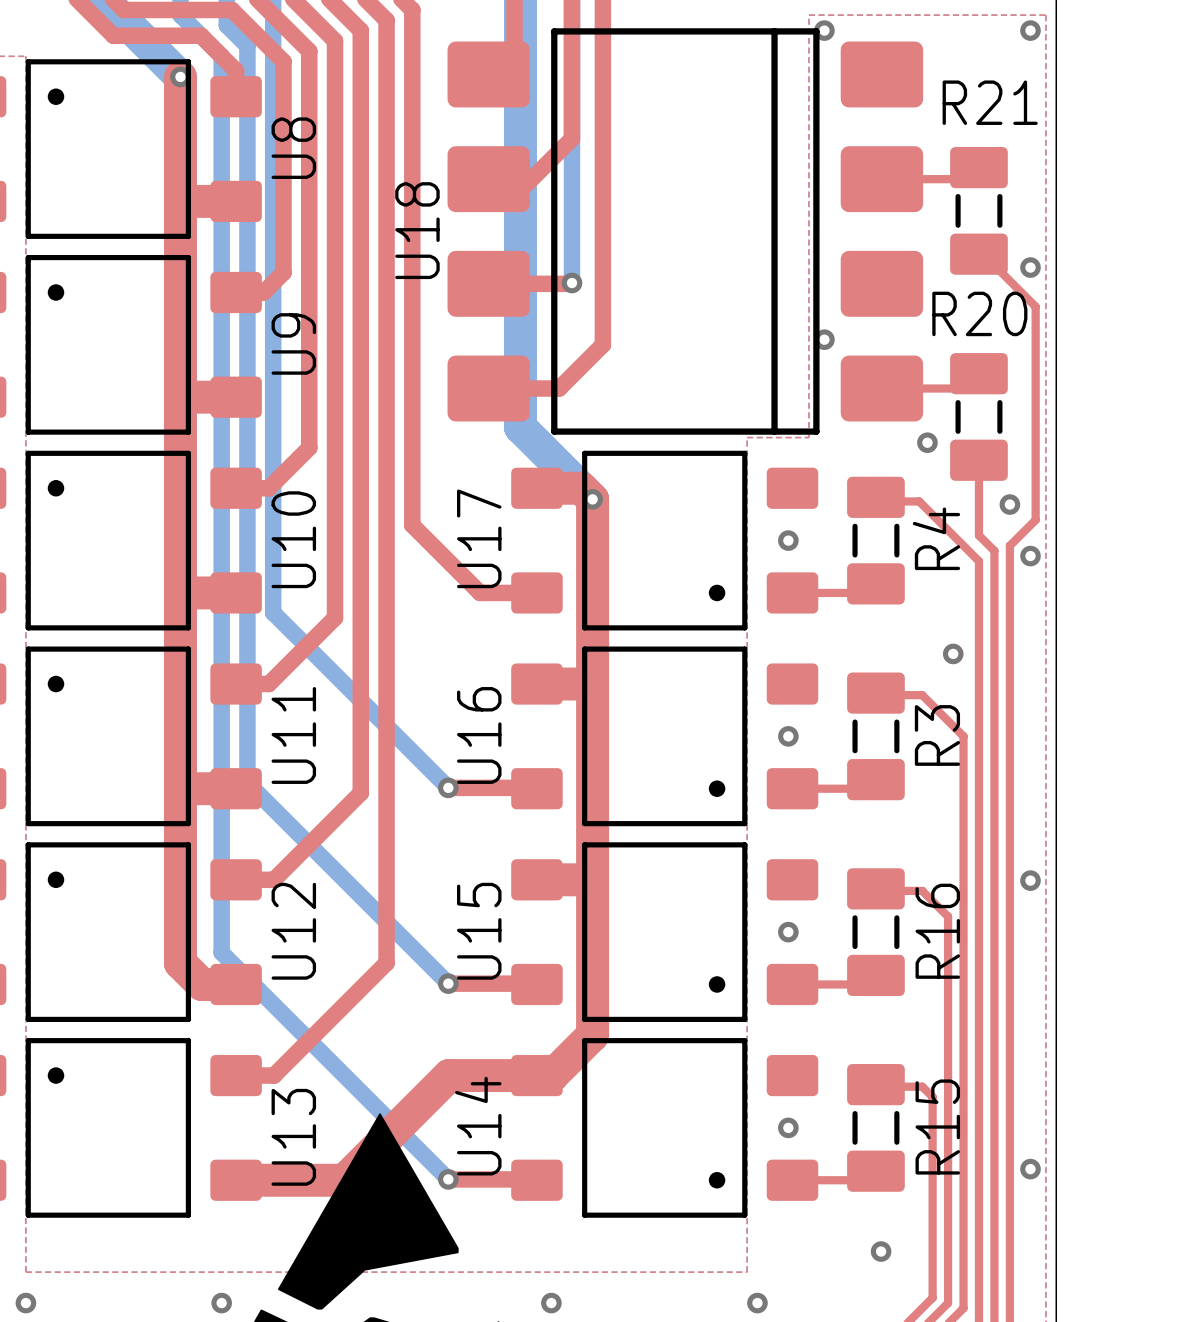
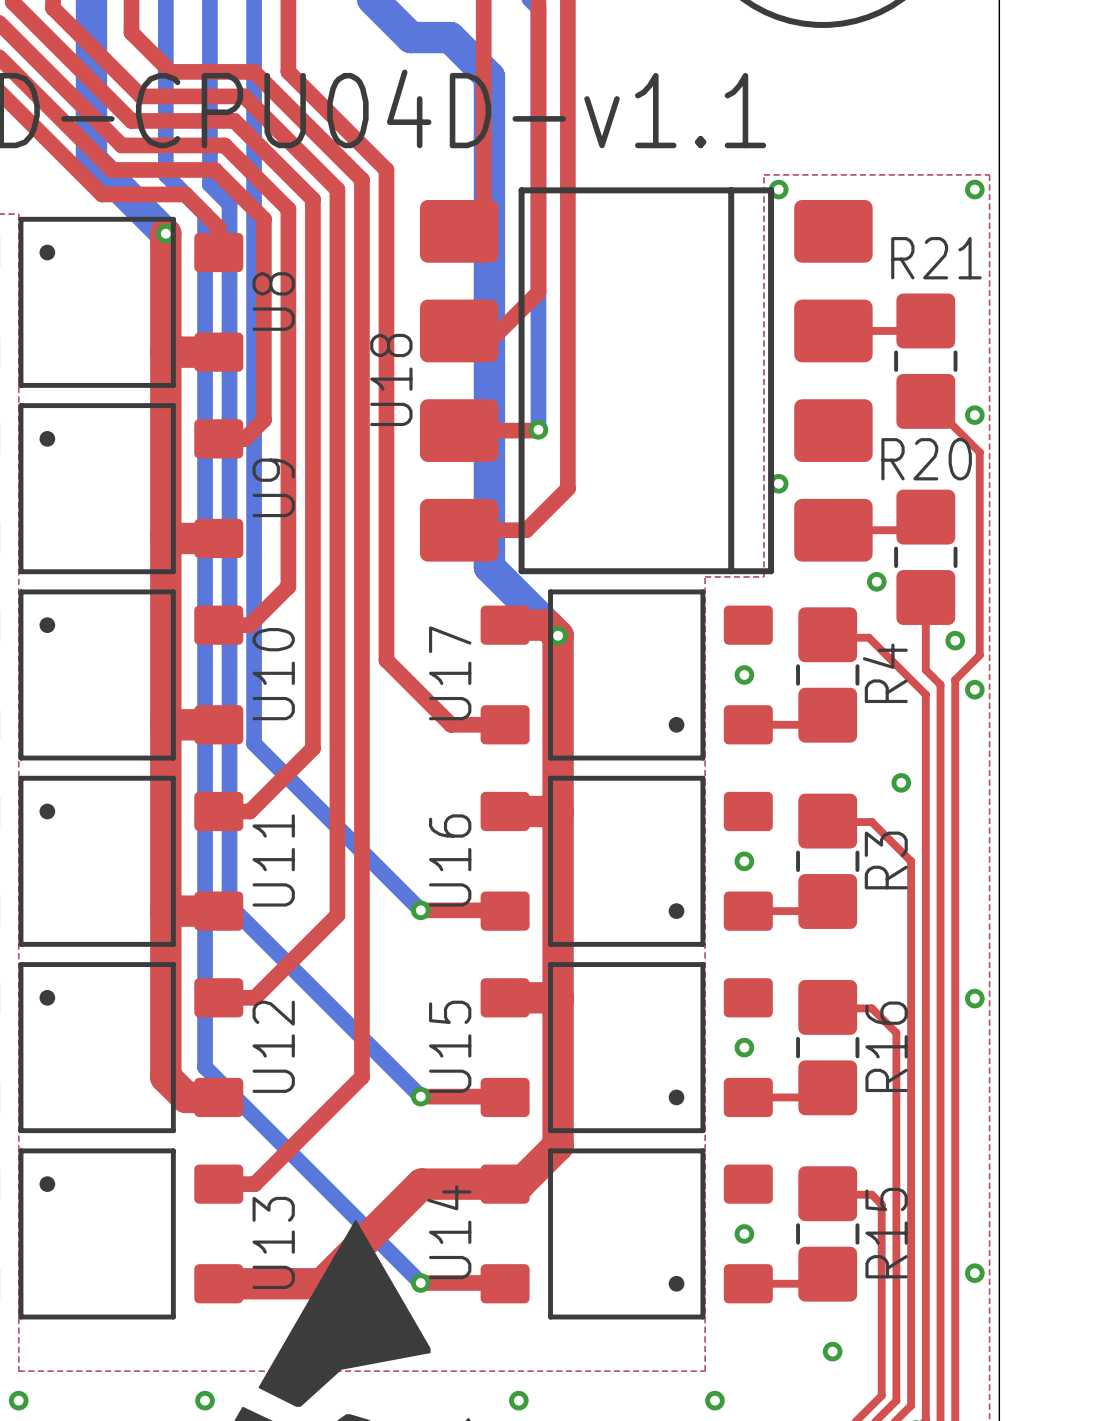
R21 footprint: [950, 147, 1008, 275] -> [894, 293, 958, 429]
R20 footprint: [950, 353, 1008, 481] -> [894, 489, 958, 625]
R4 footprint: [847, 476, 905, 605] -> [796, 607, 860, 743]
R3 footprint: [847, 672, 905, 801] -> [796, 793, 860, 929]
R16 footprint: [847, 868, 905, 997] -> [796, 979, 860, 1116]
R15 footprint: [847, 1064, 905, 1192] -> [796, 1166, 860, 1302]

